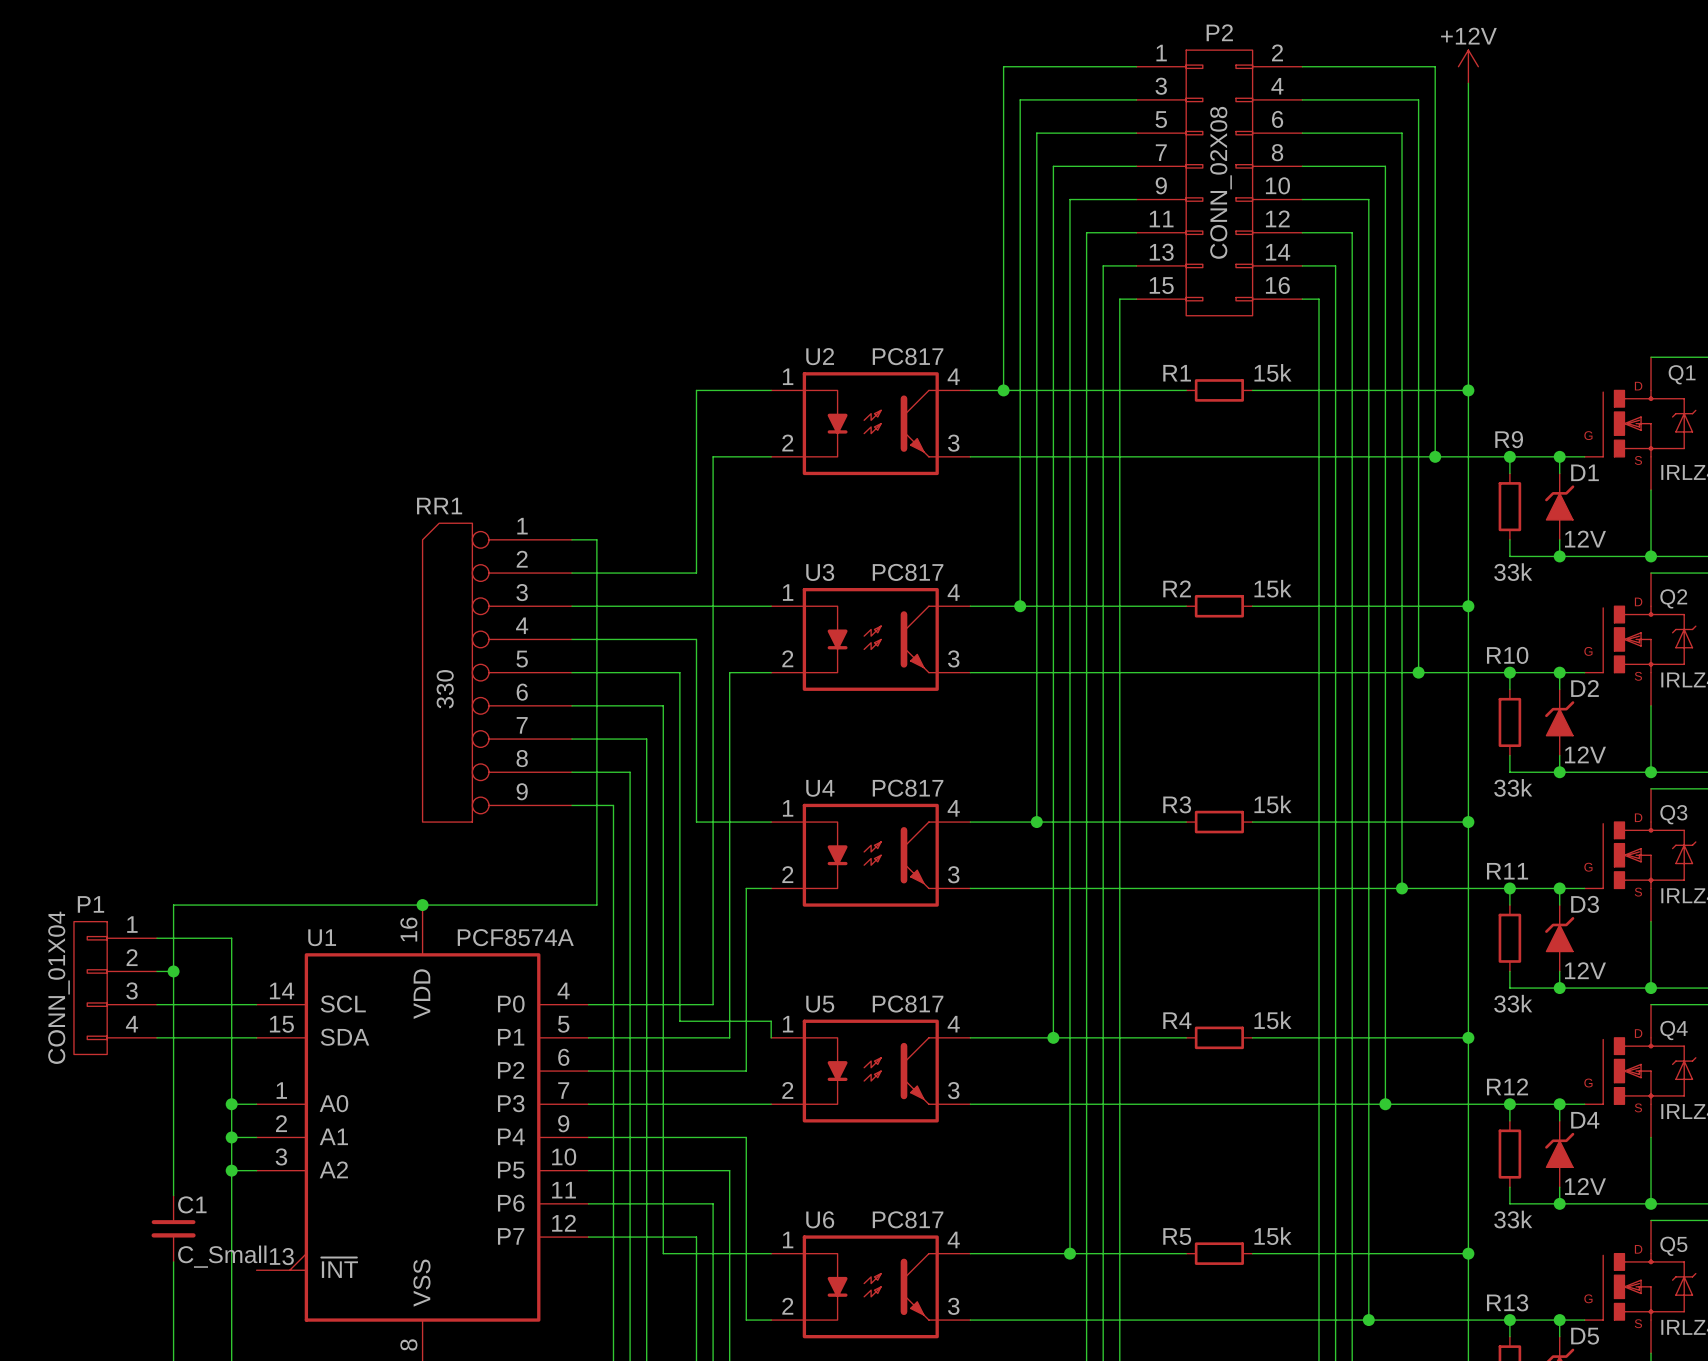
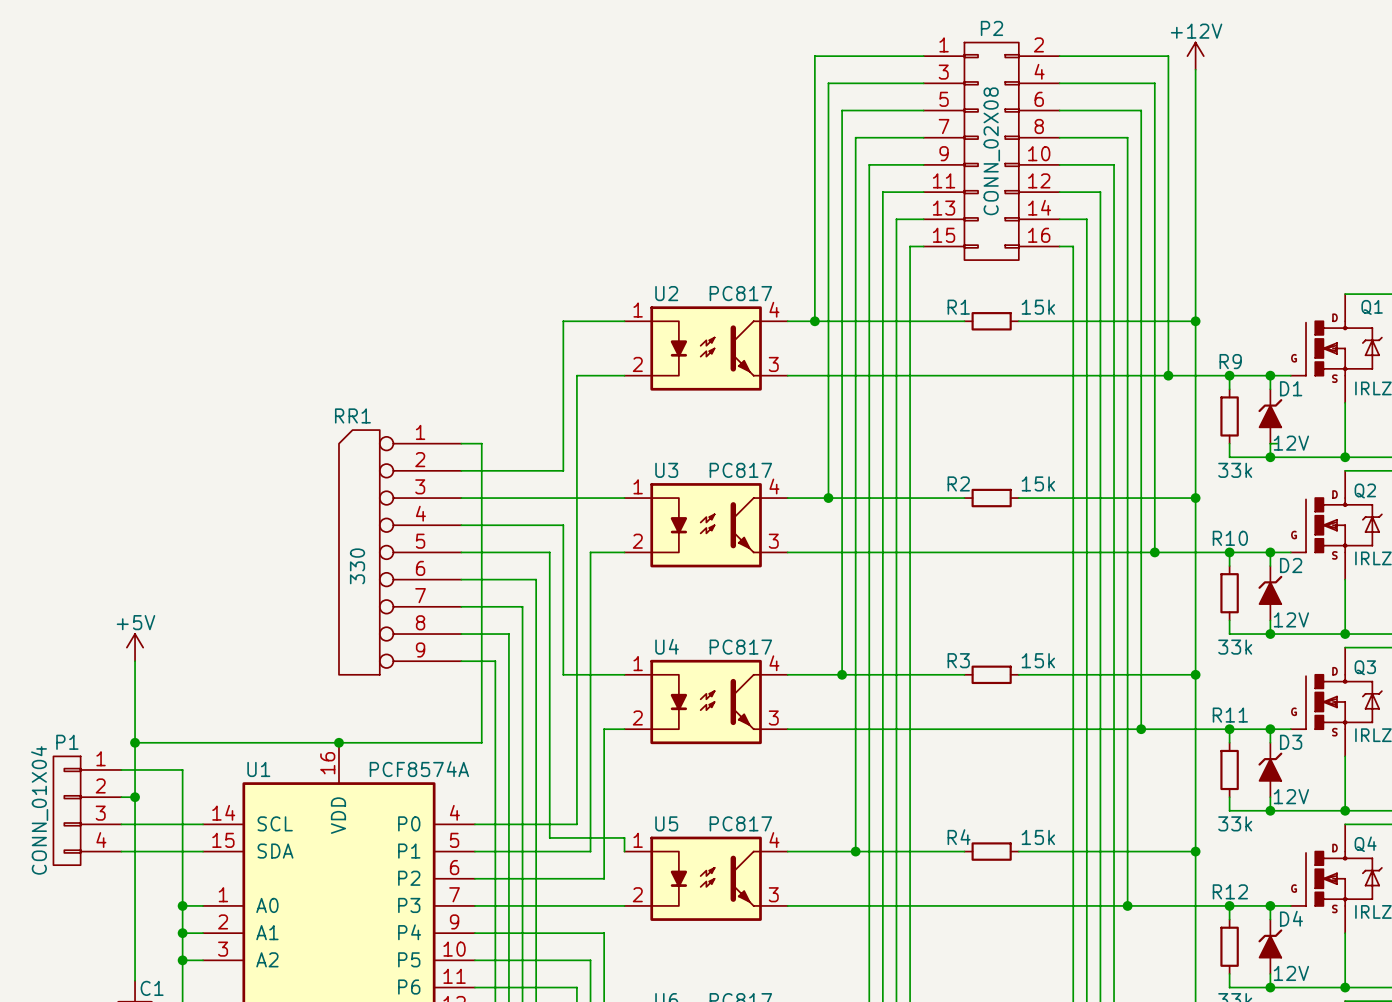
wire: none -> (1270, 443) (1277, 443)
power symbol: none -> +5V (135, 647)
wire: none -> (135, 661) (135, 742)
junction: none -> (135, 742)

